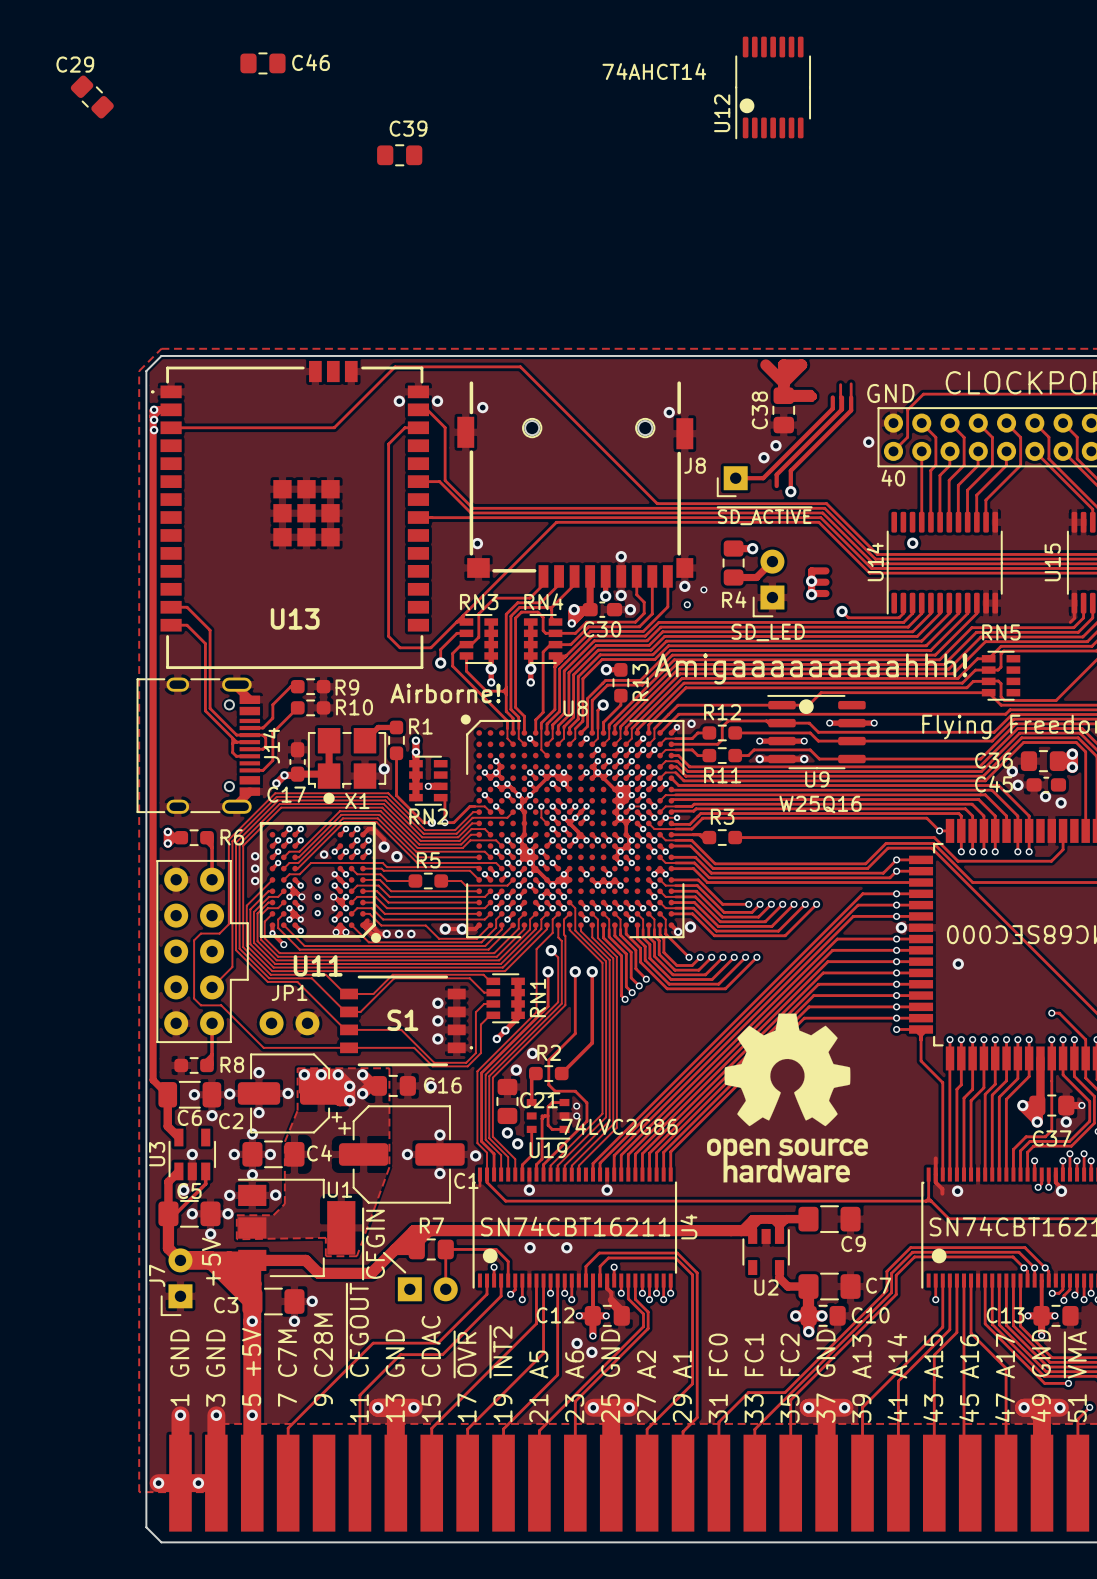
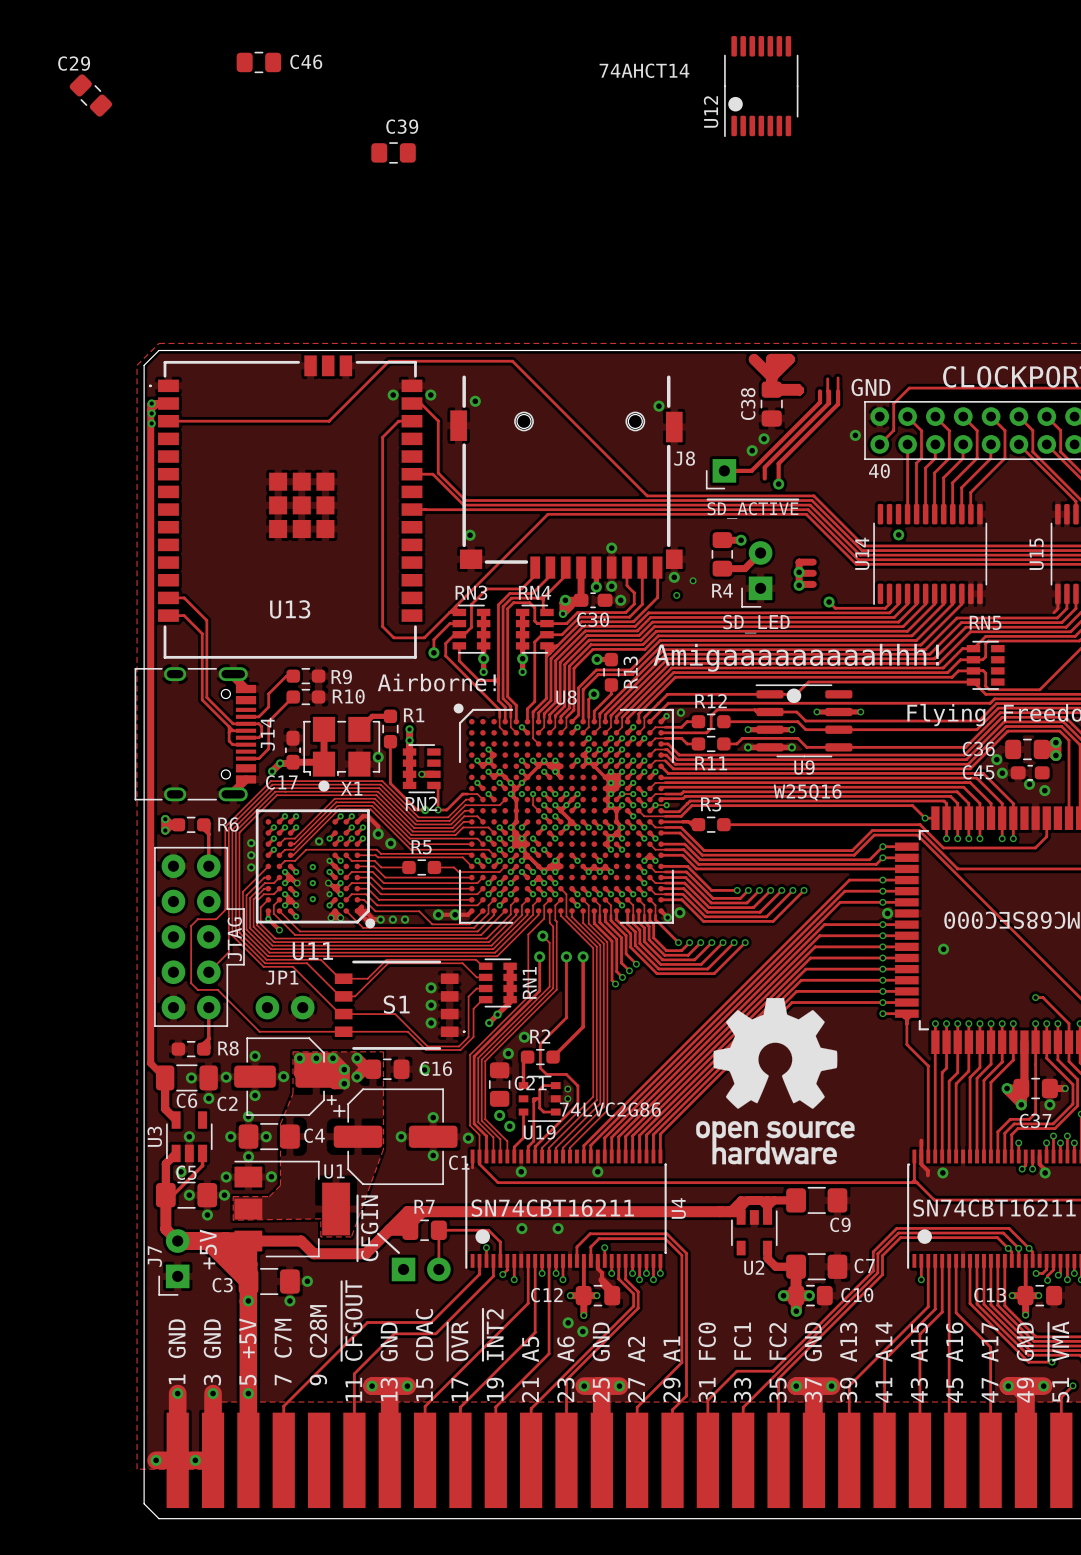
text: none -> JTAG (234, 939)

